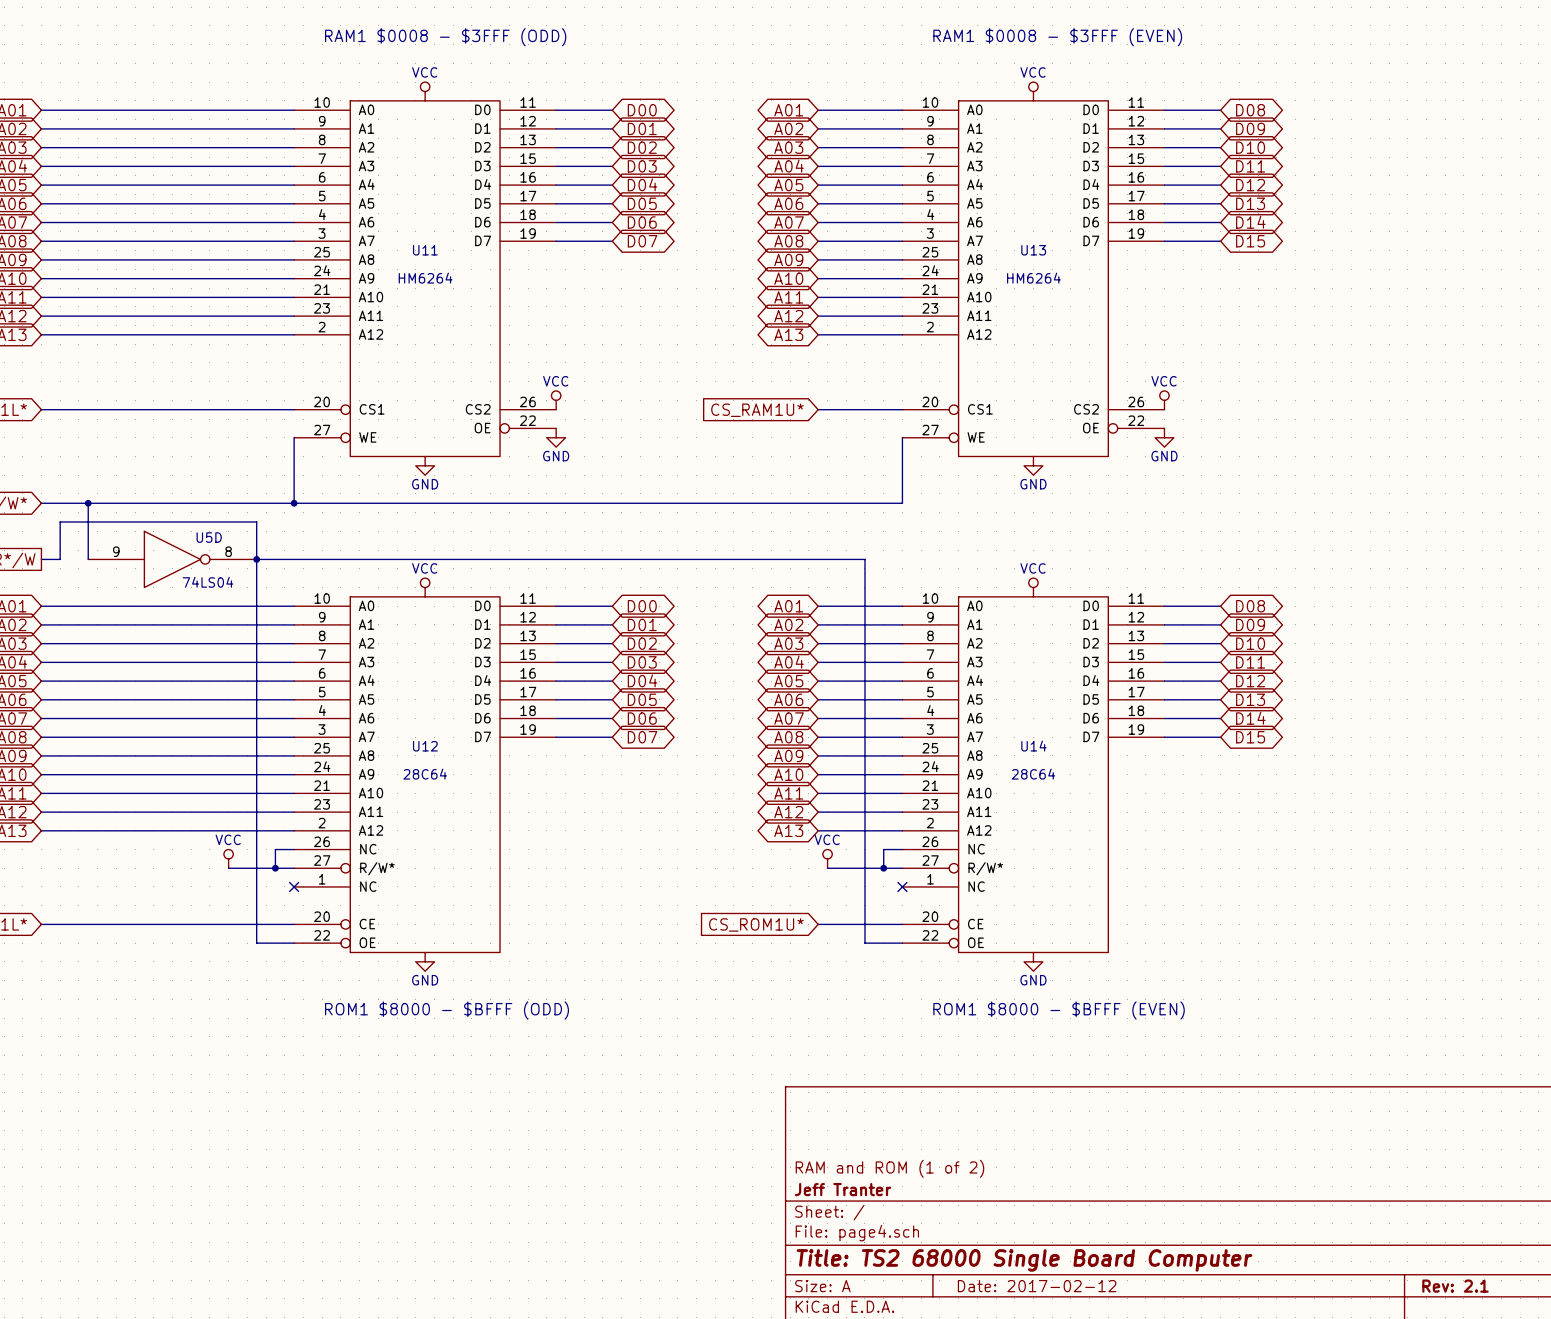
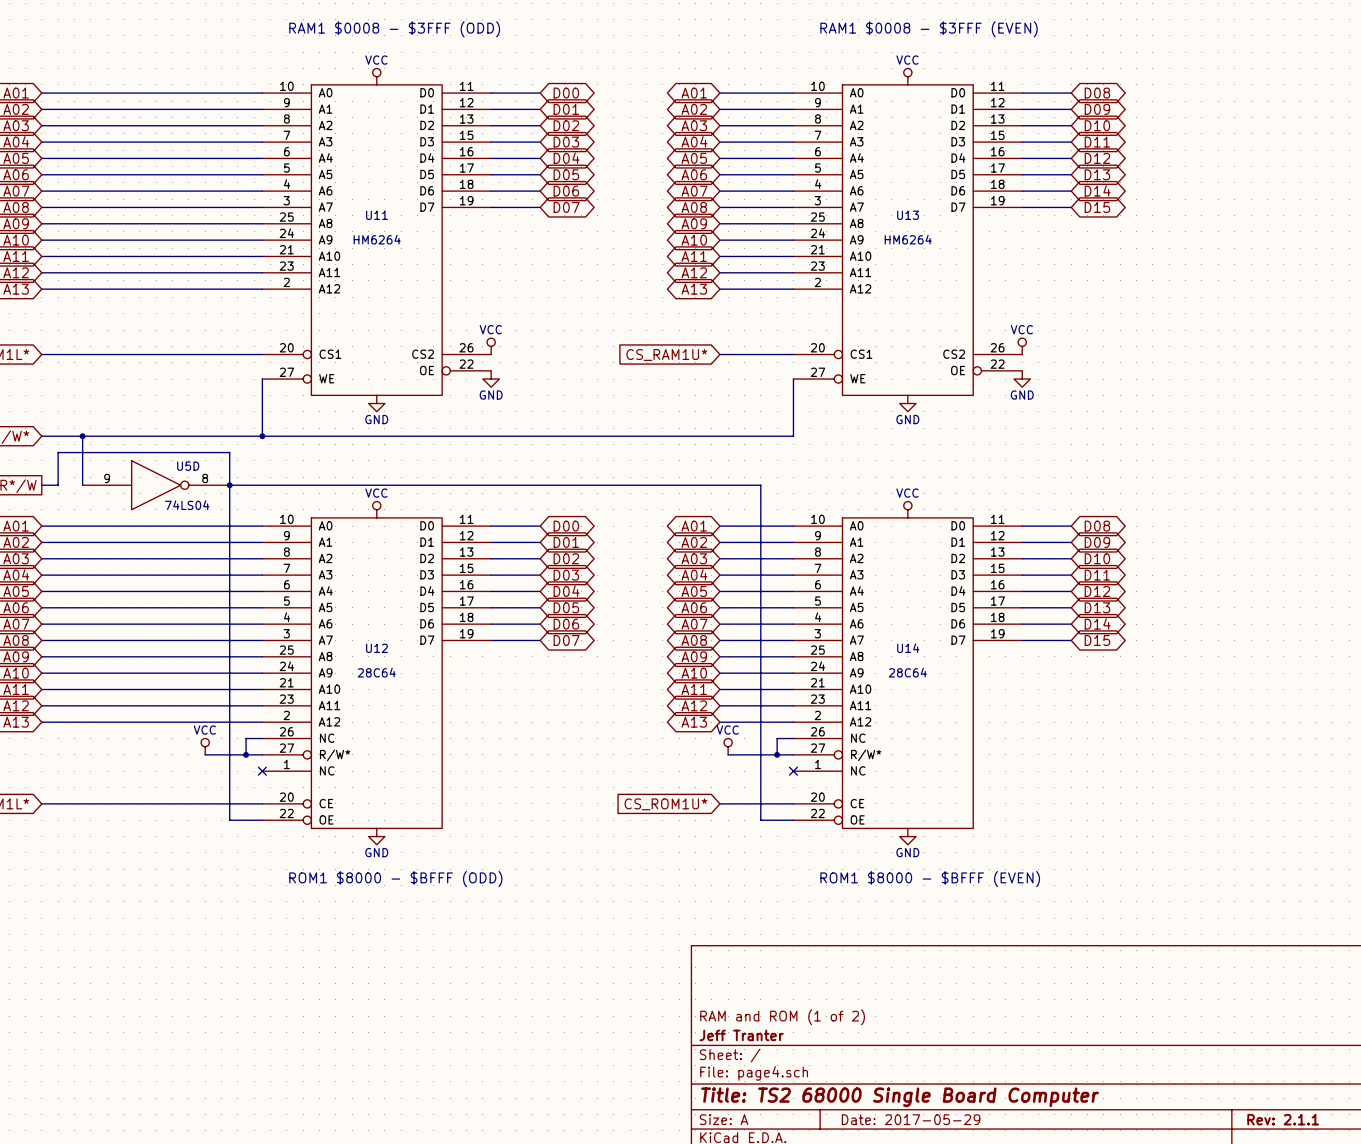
title block: Date: 2017-02-12 (1037, 1286) -> Date: 2017-05-29 (911, 1119)
title block: Rev: 2.1 (1455, 1286) -> Rev: 2.1.1 (1283, 1119)

